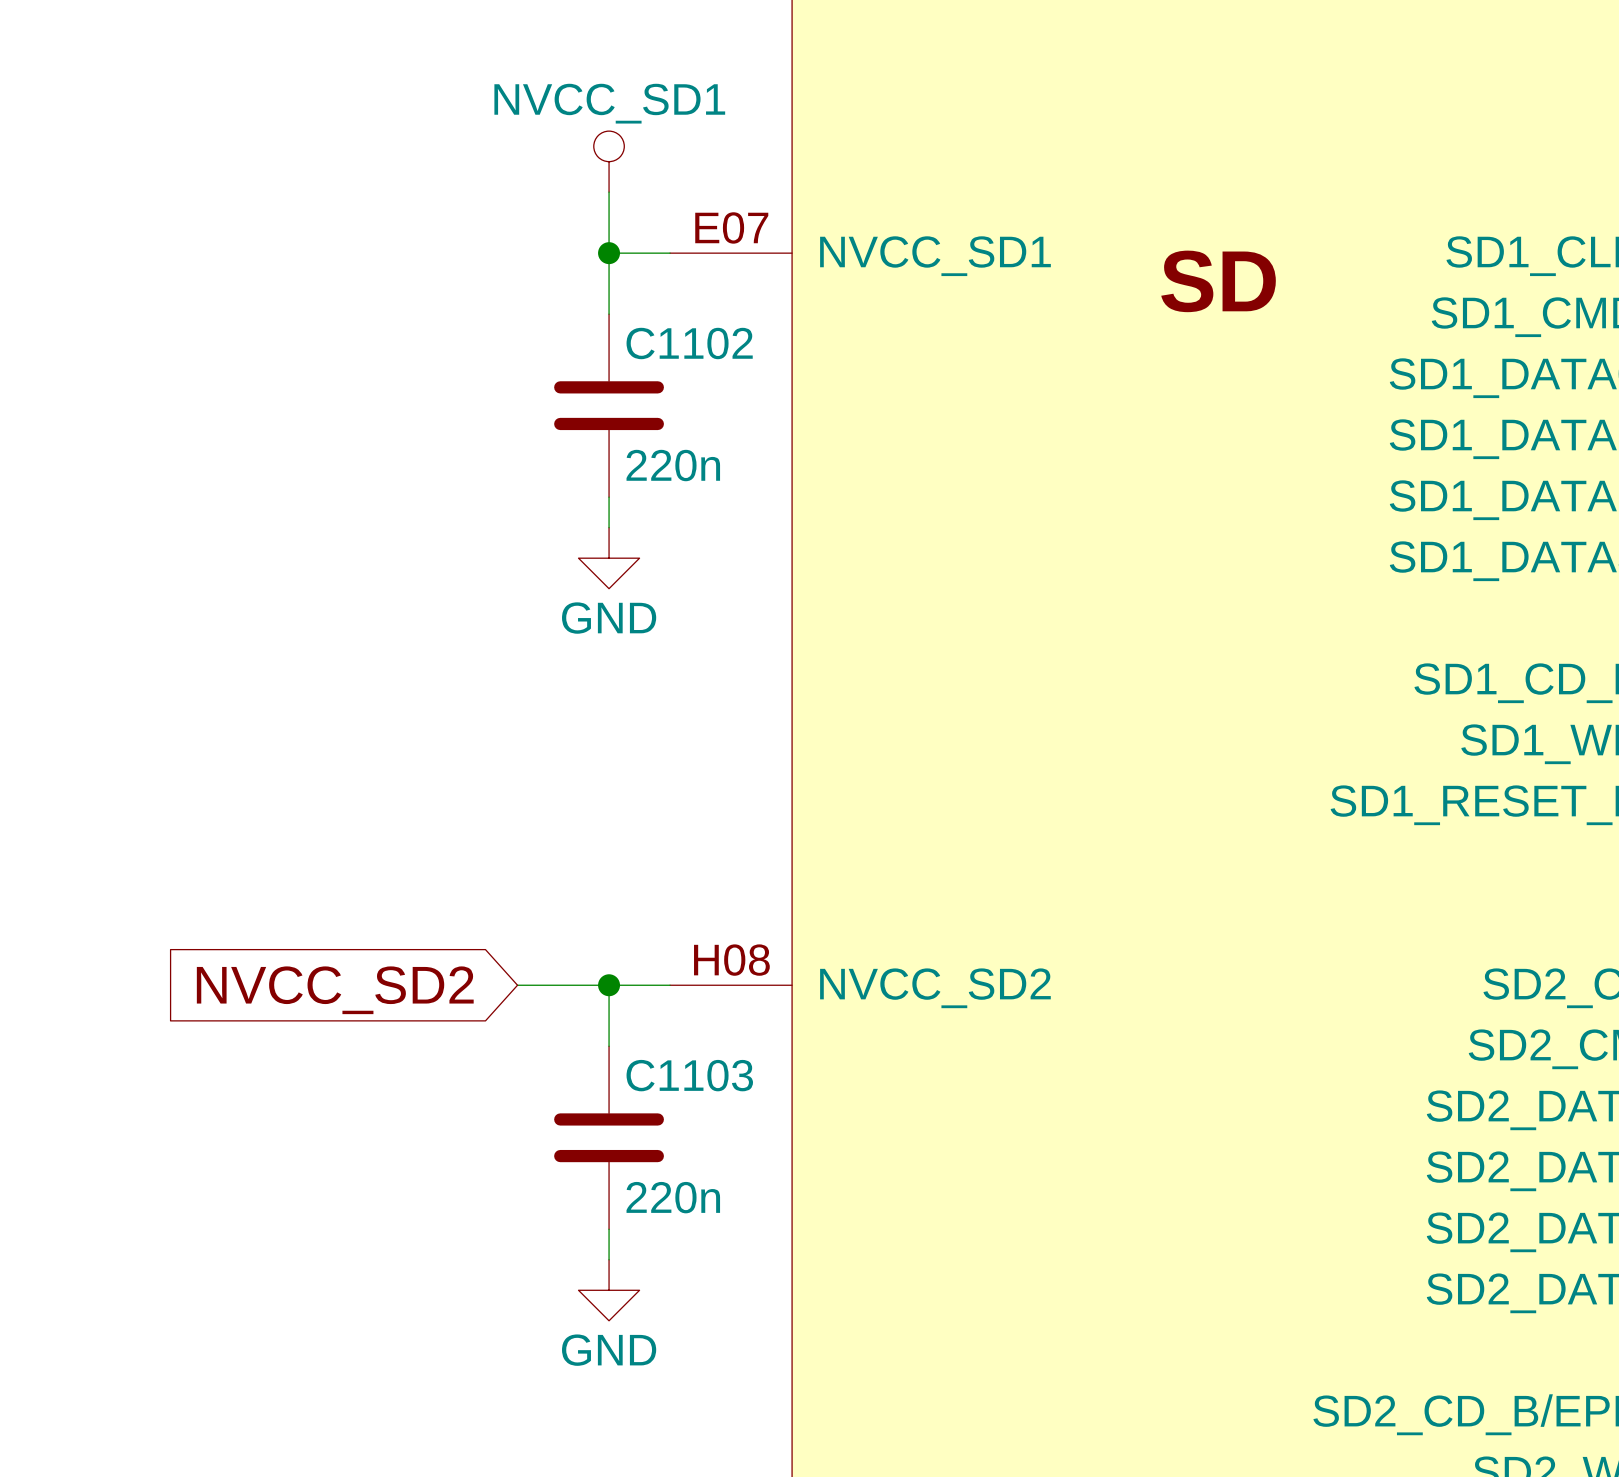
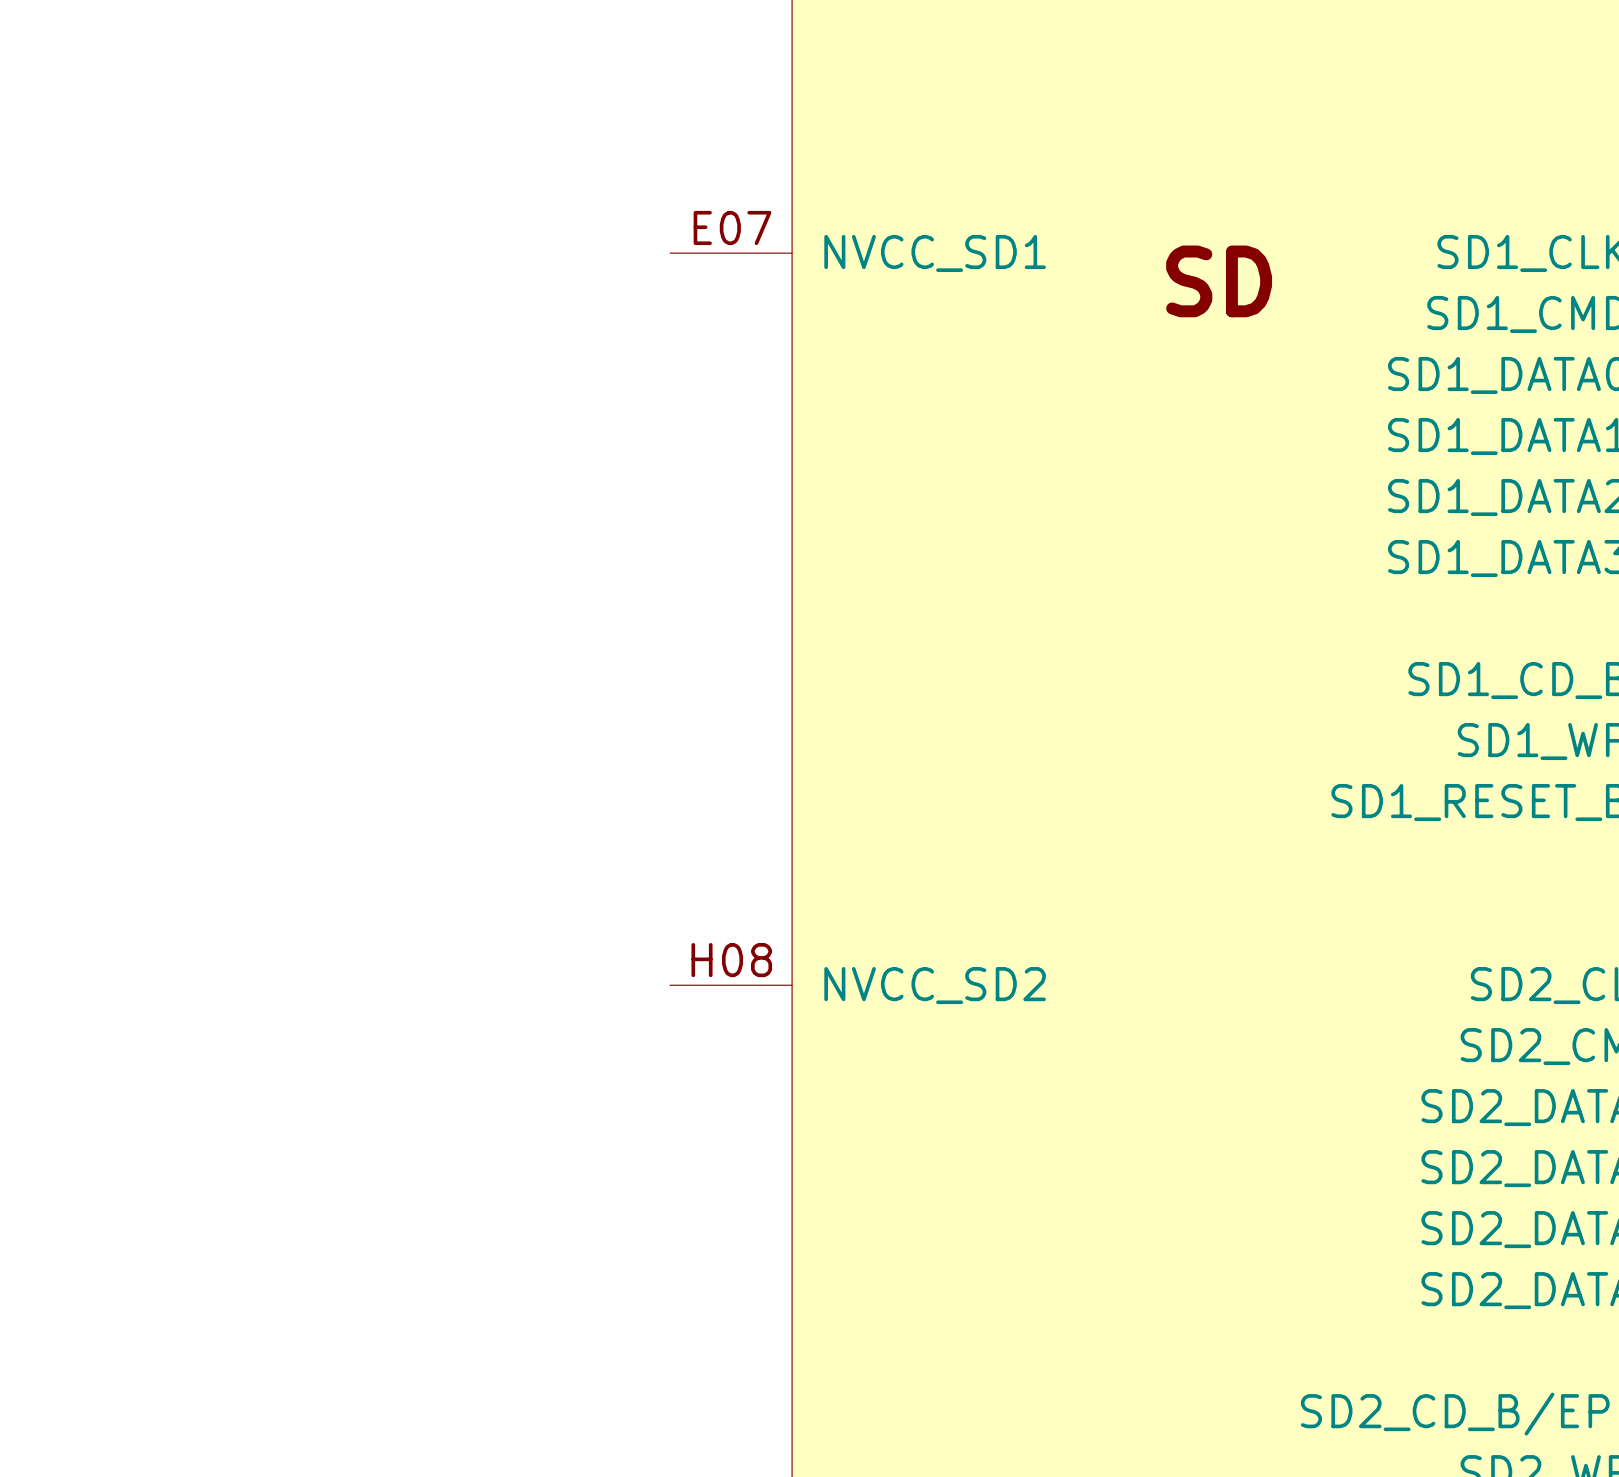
power symbol: NVCC_SD1 (609, 161) -> none
wire: (609, 192) (609, 314) -> none
wire: (609, 253) (670, 253) -> none
junction: (609, 253) -> none
C1102: 220n (609, 405) -> none
wire: (609, 497) (609, 527) -> none
power symbol: GND (609, 558) -> none
wire: (517, 985) (670, 985) -> none
wire: (609, 985) (609, 1046) -> none
junction: (609, 985) -> none
global label: NVCC_SD2 (335, 990) -> none
C1103: 220n (609, 1137) -> none
wire: (609, 1229) (609, 1259) -> none
power symbol: GND (609, 1290) -> none

